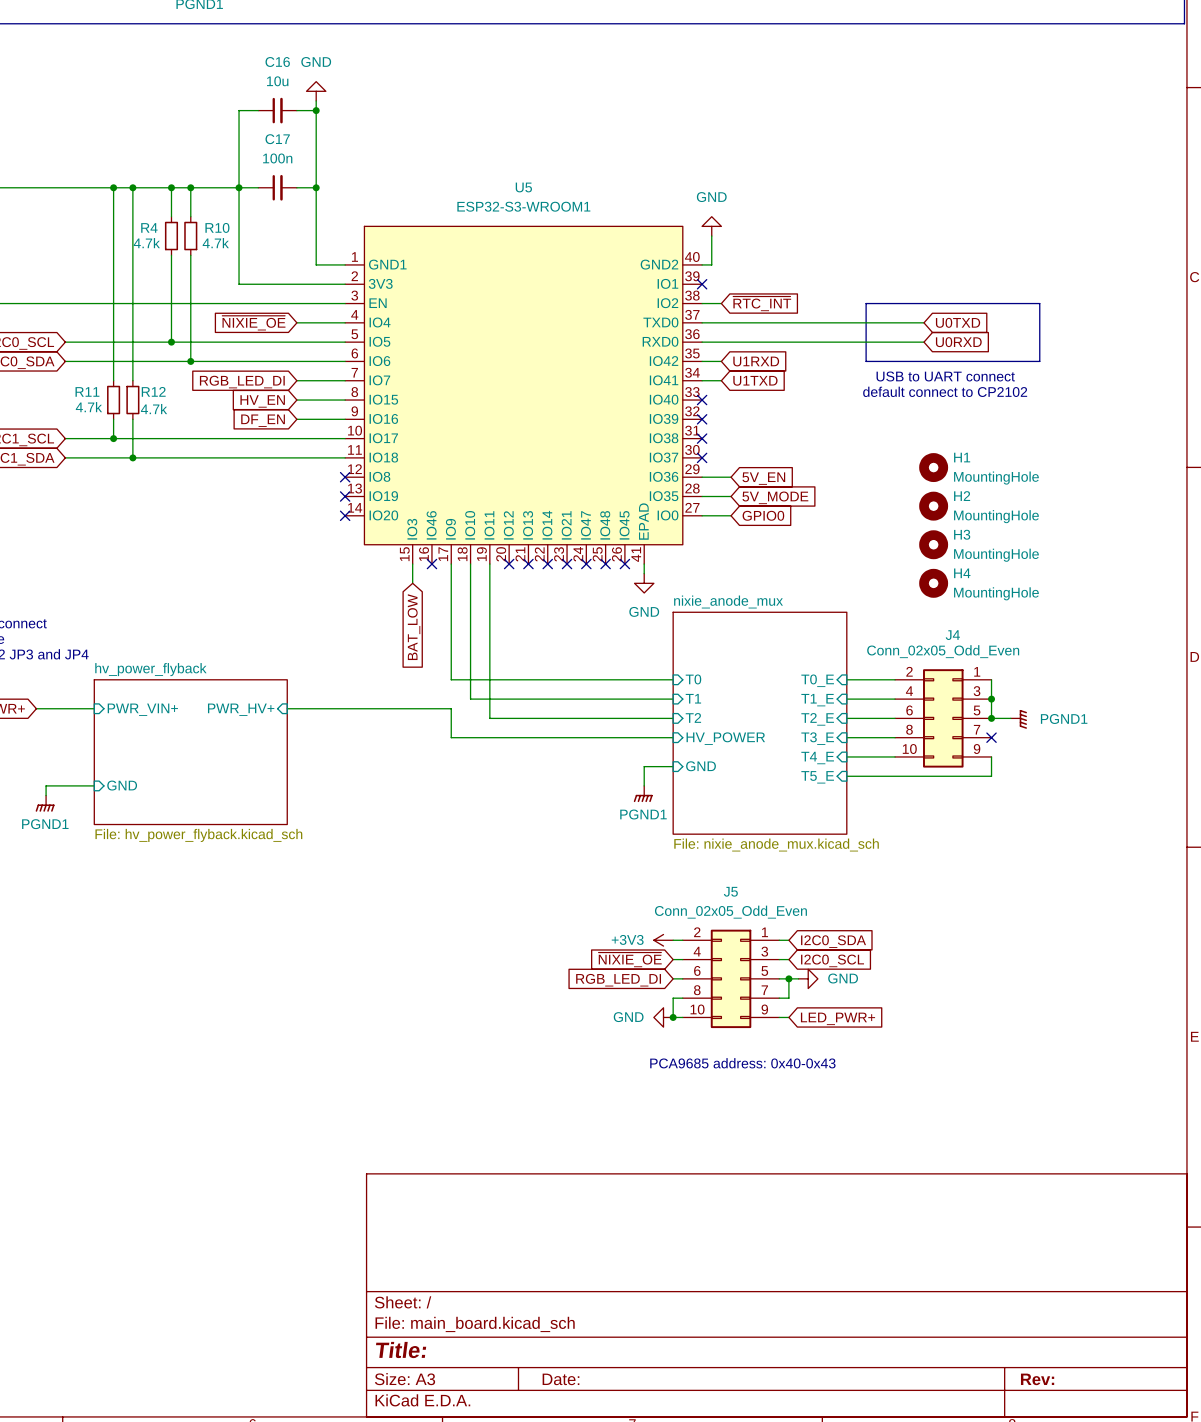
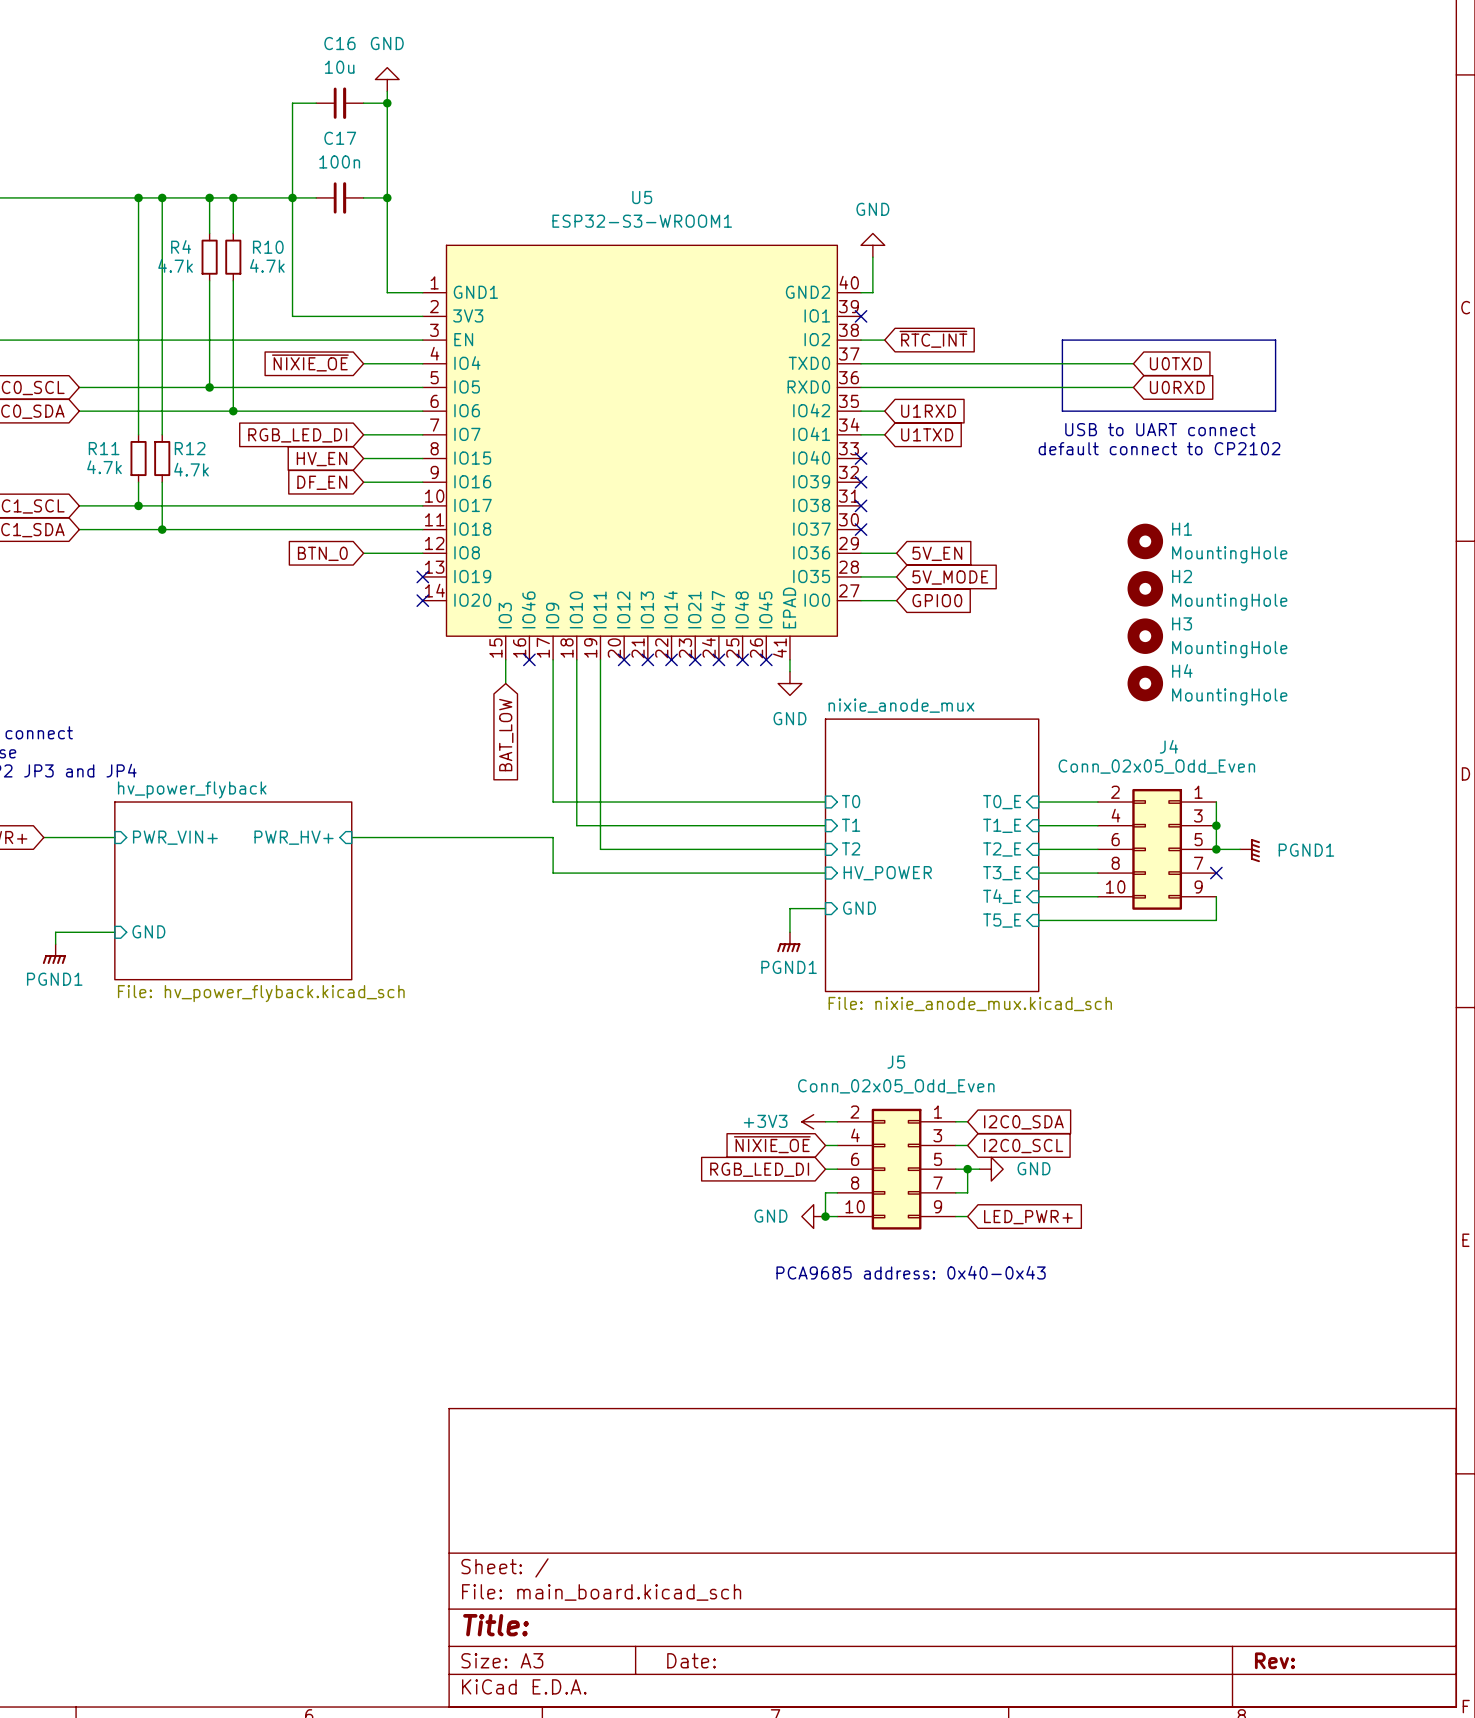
wire: none -> (363, 553) (422, 553)
no-connect mark: (345, 477) -> none
global label: none -> BTN_0 (322, 553)

